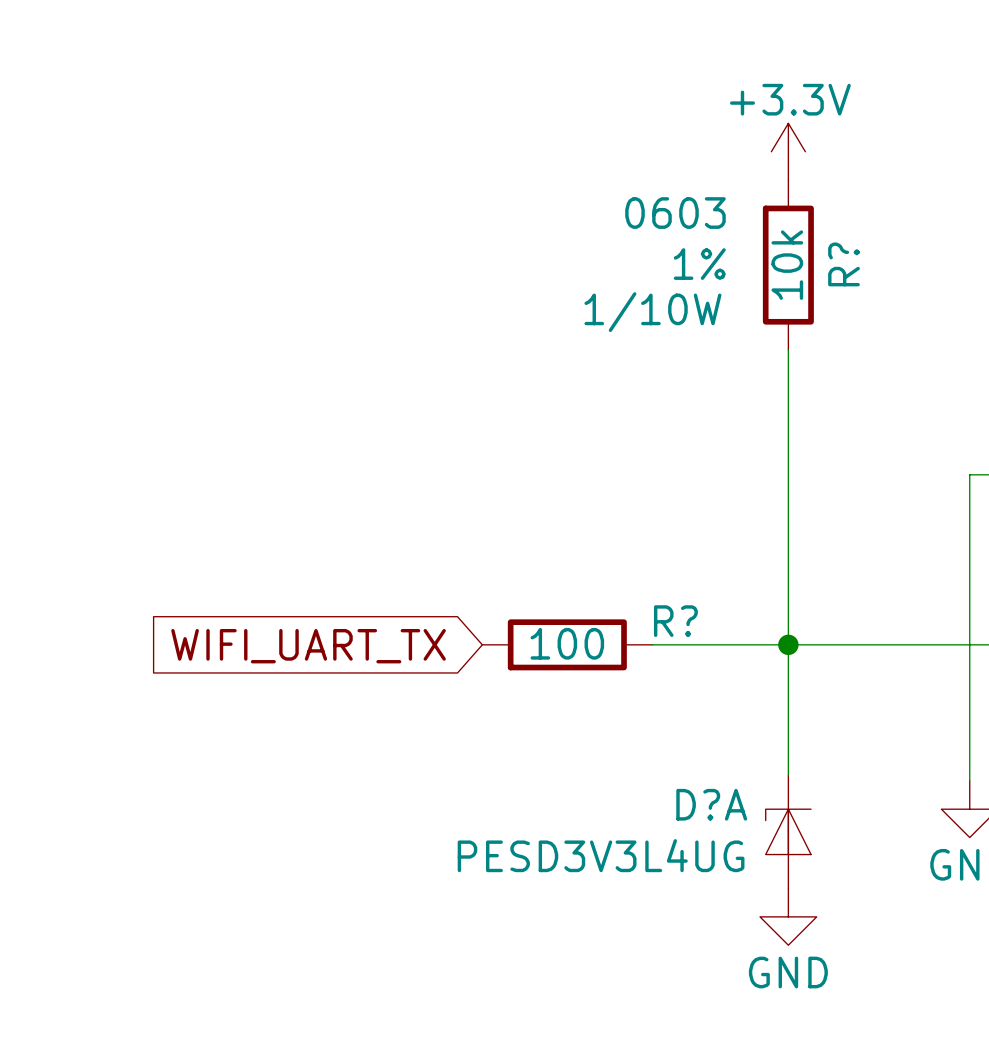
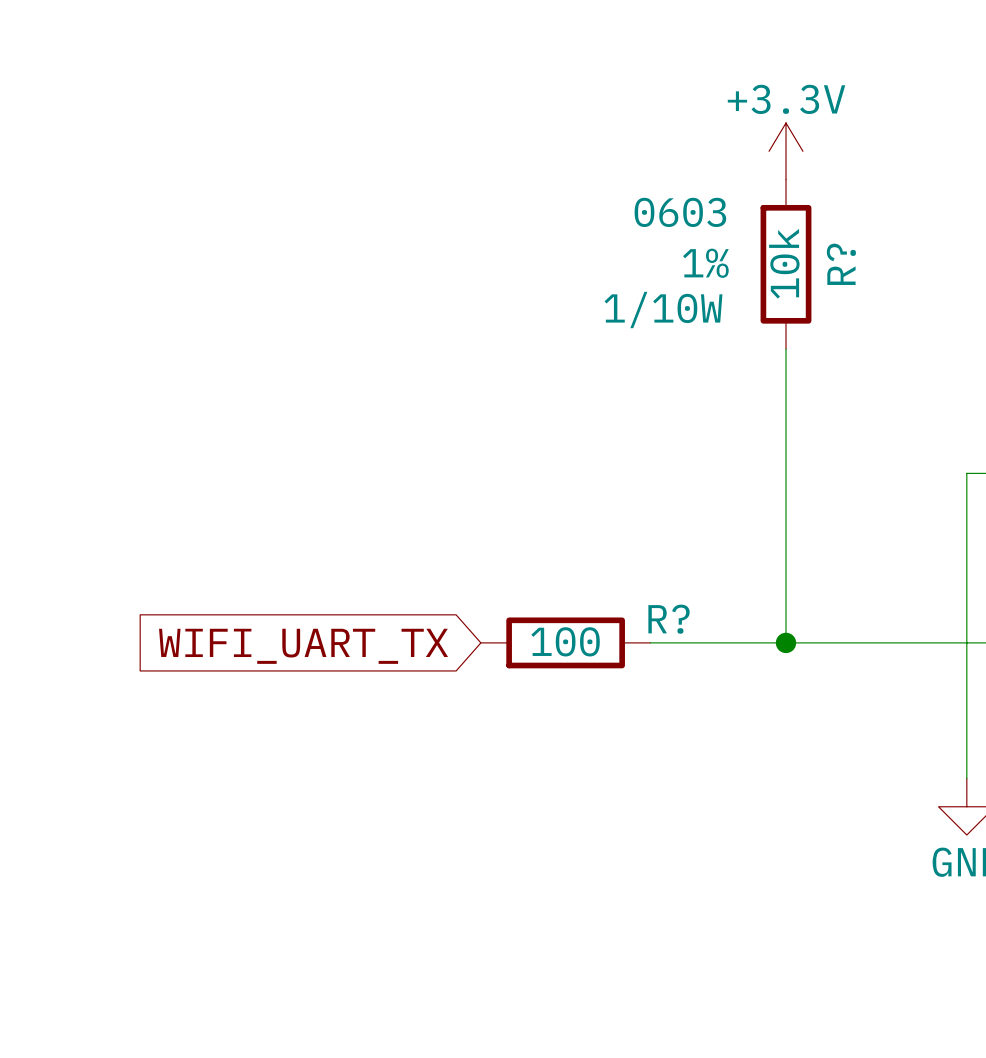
wire: (788, 644) (788, 775) -> none
D?A: PESD3V3L4UG (788, 831) -> none
power symbol: GND (788, 916) -> none

